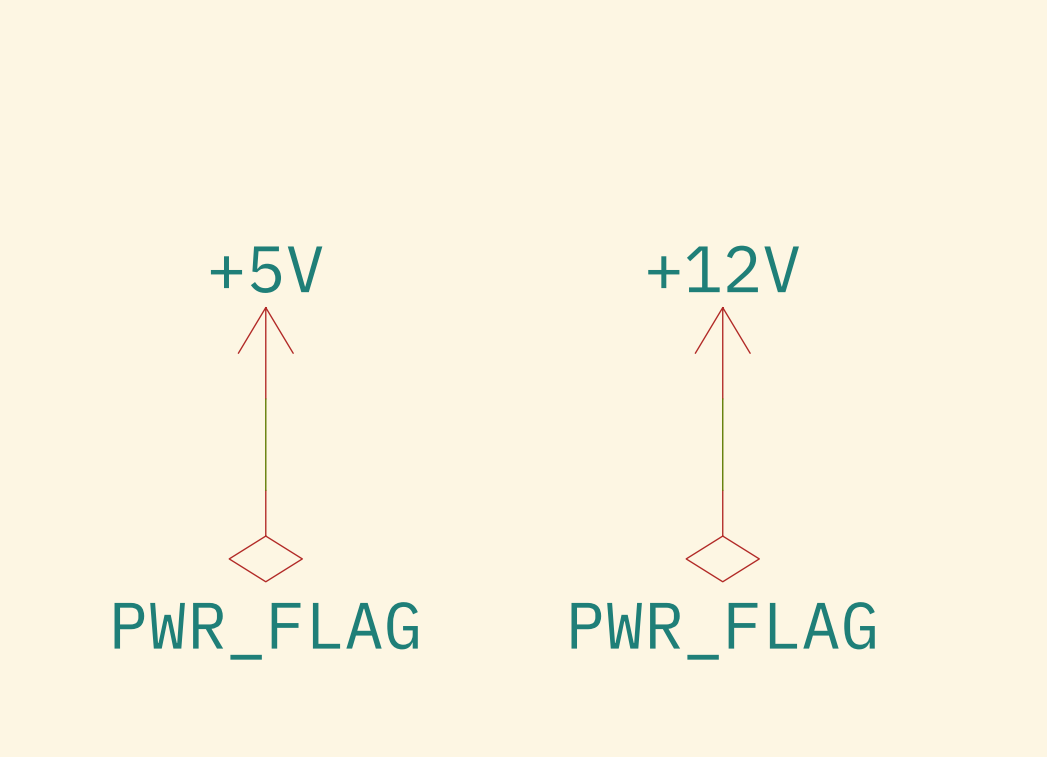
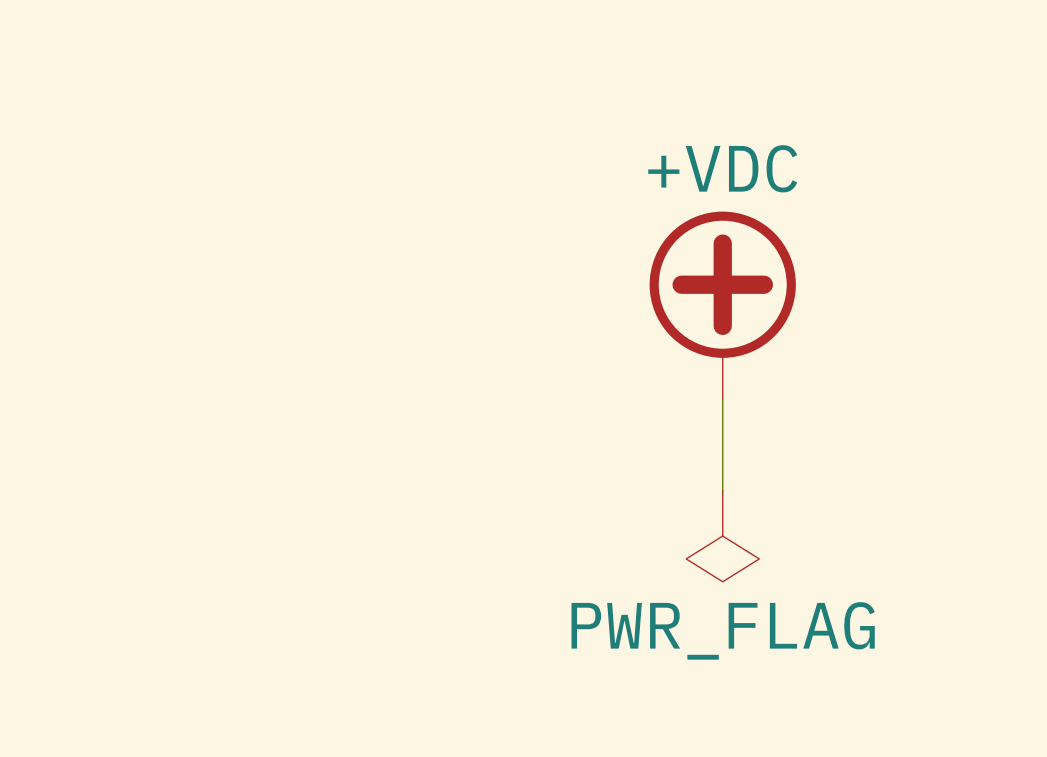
power symbol: none -> +VDC (722, 305)
power symbol: +5V (265, 353) -> none
power symbol: +12V (722, 353) -> none
wire: (265, 398) (265, 490) -> none
power symbol: PWR_FLAG (265, 536) -> none

